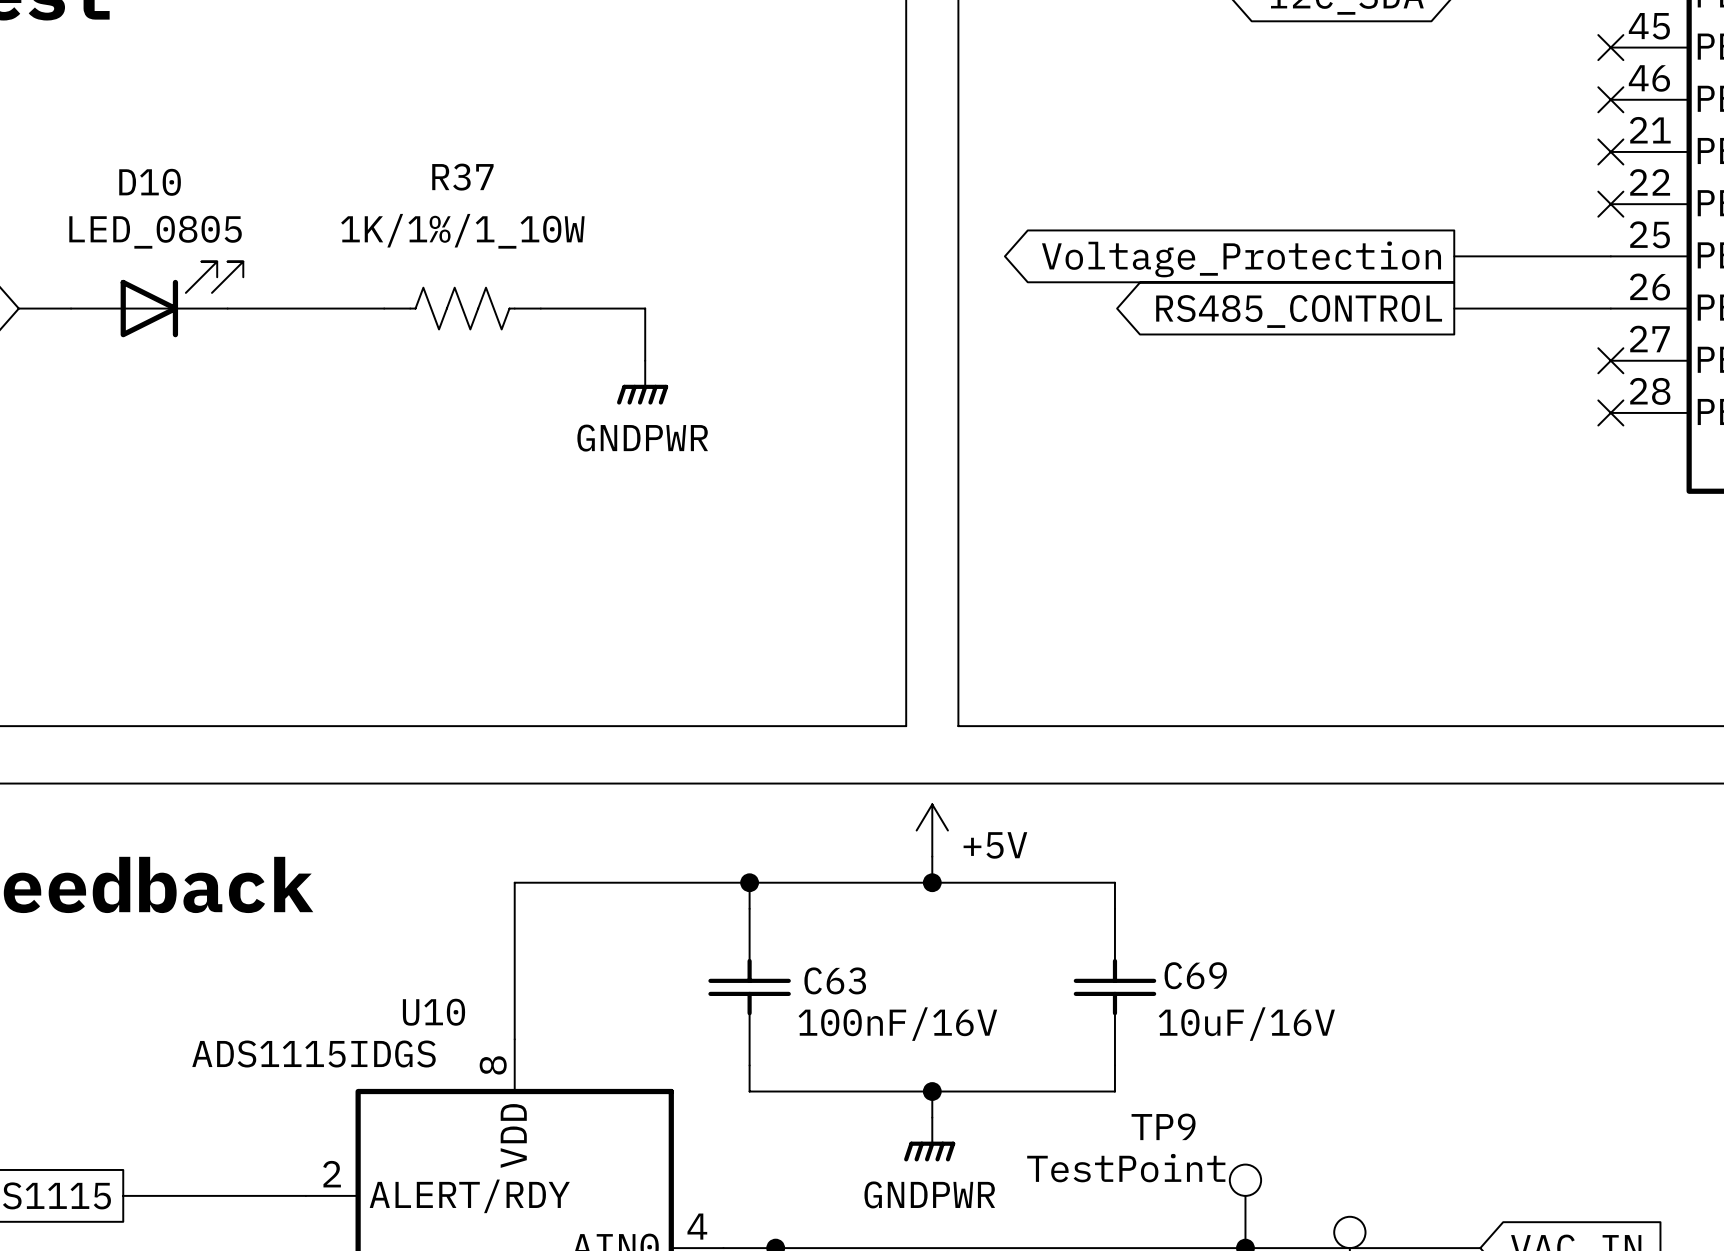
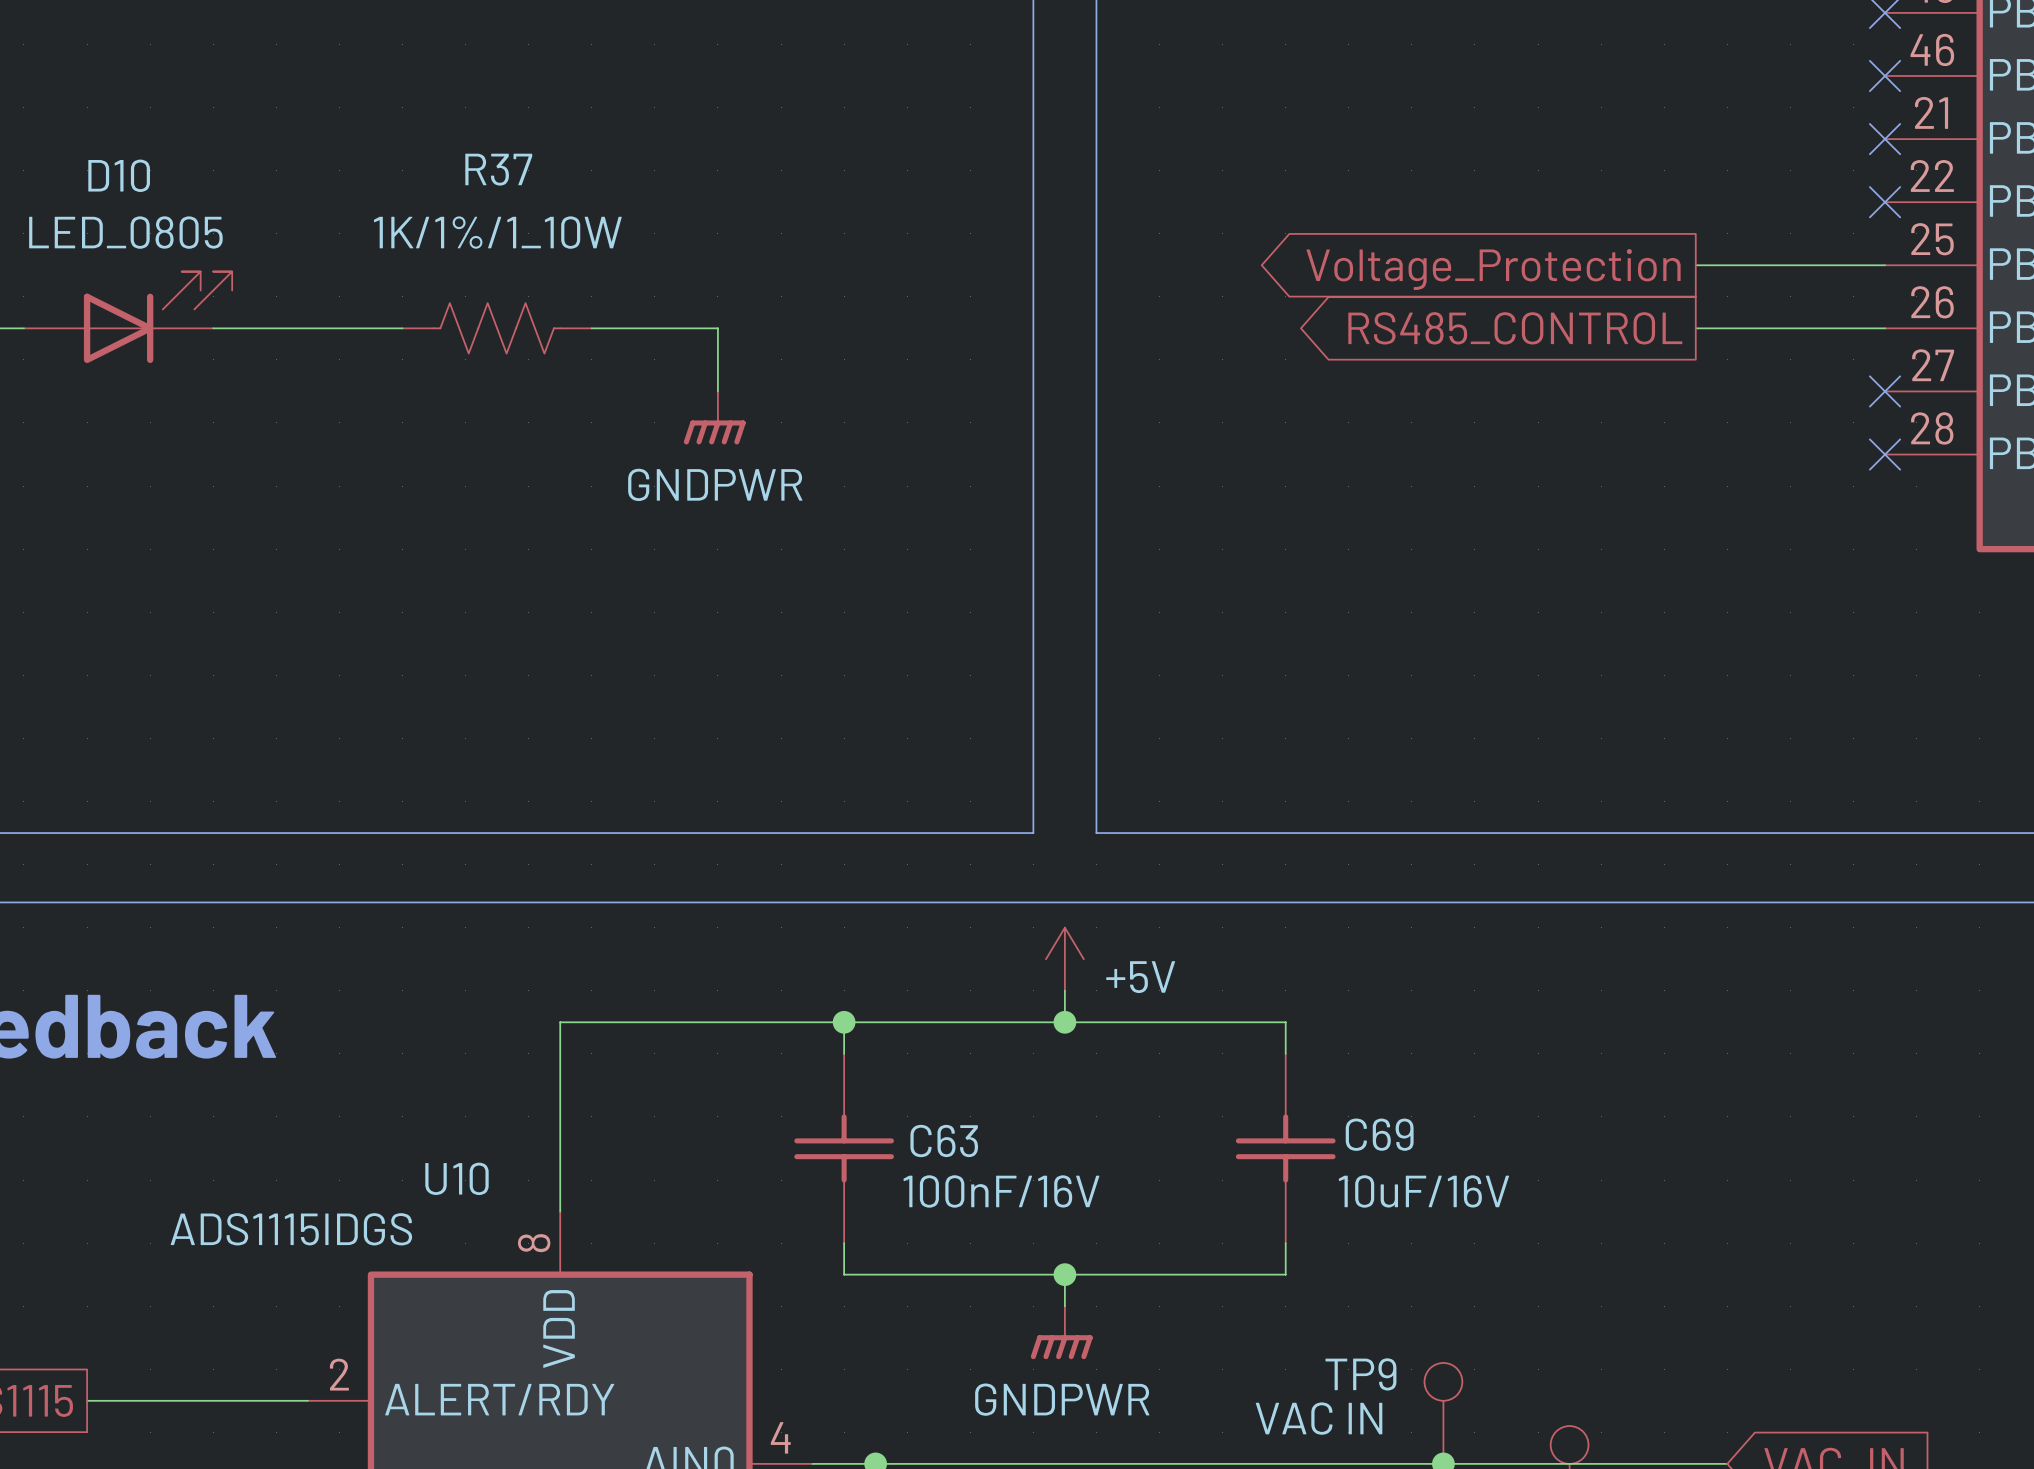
TP9 name position: TP9 (1163, 1126) -> TP9 (1360, 1374)
TP9 value: TestPoint (1126, 1168) -> VAC IN (1319, 1418)

